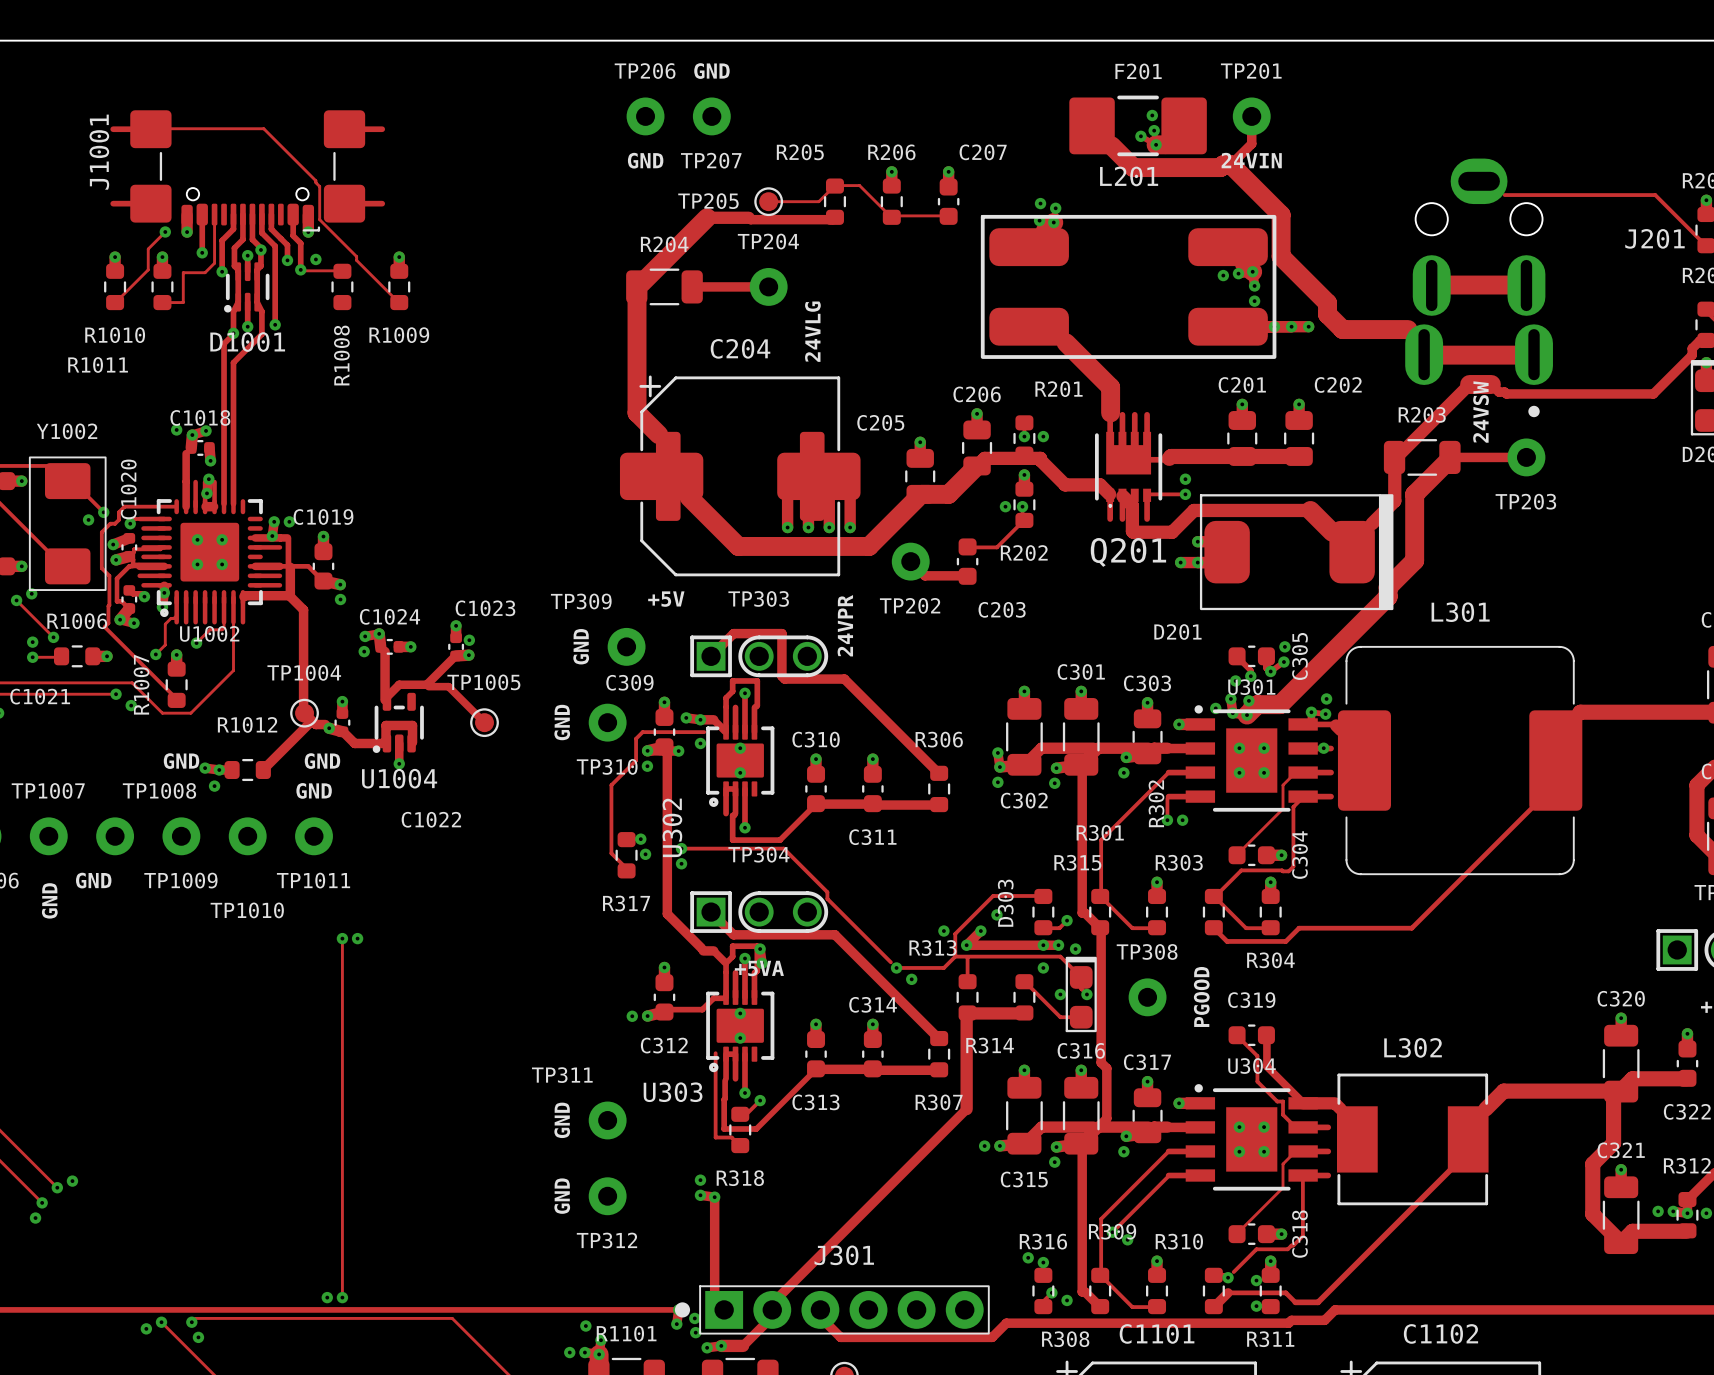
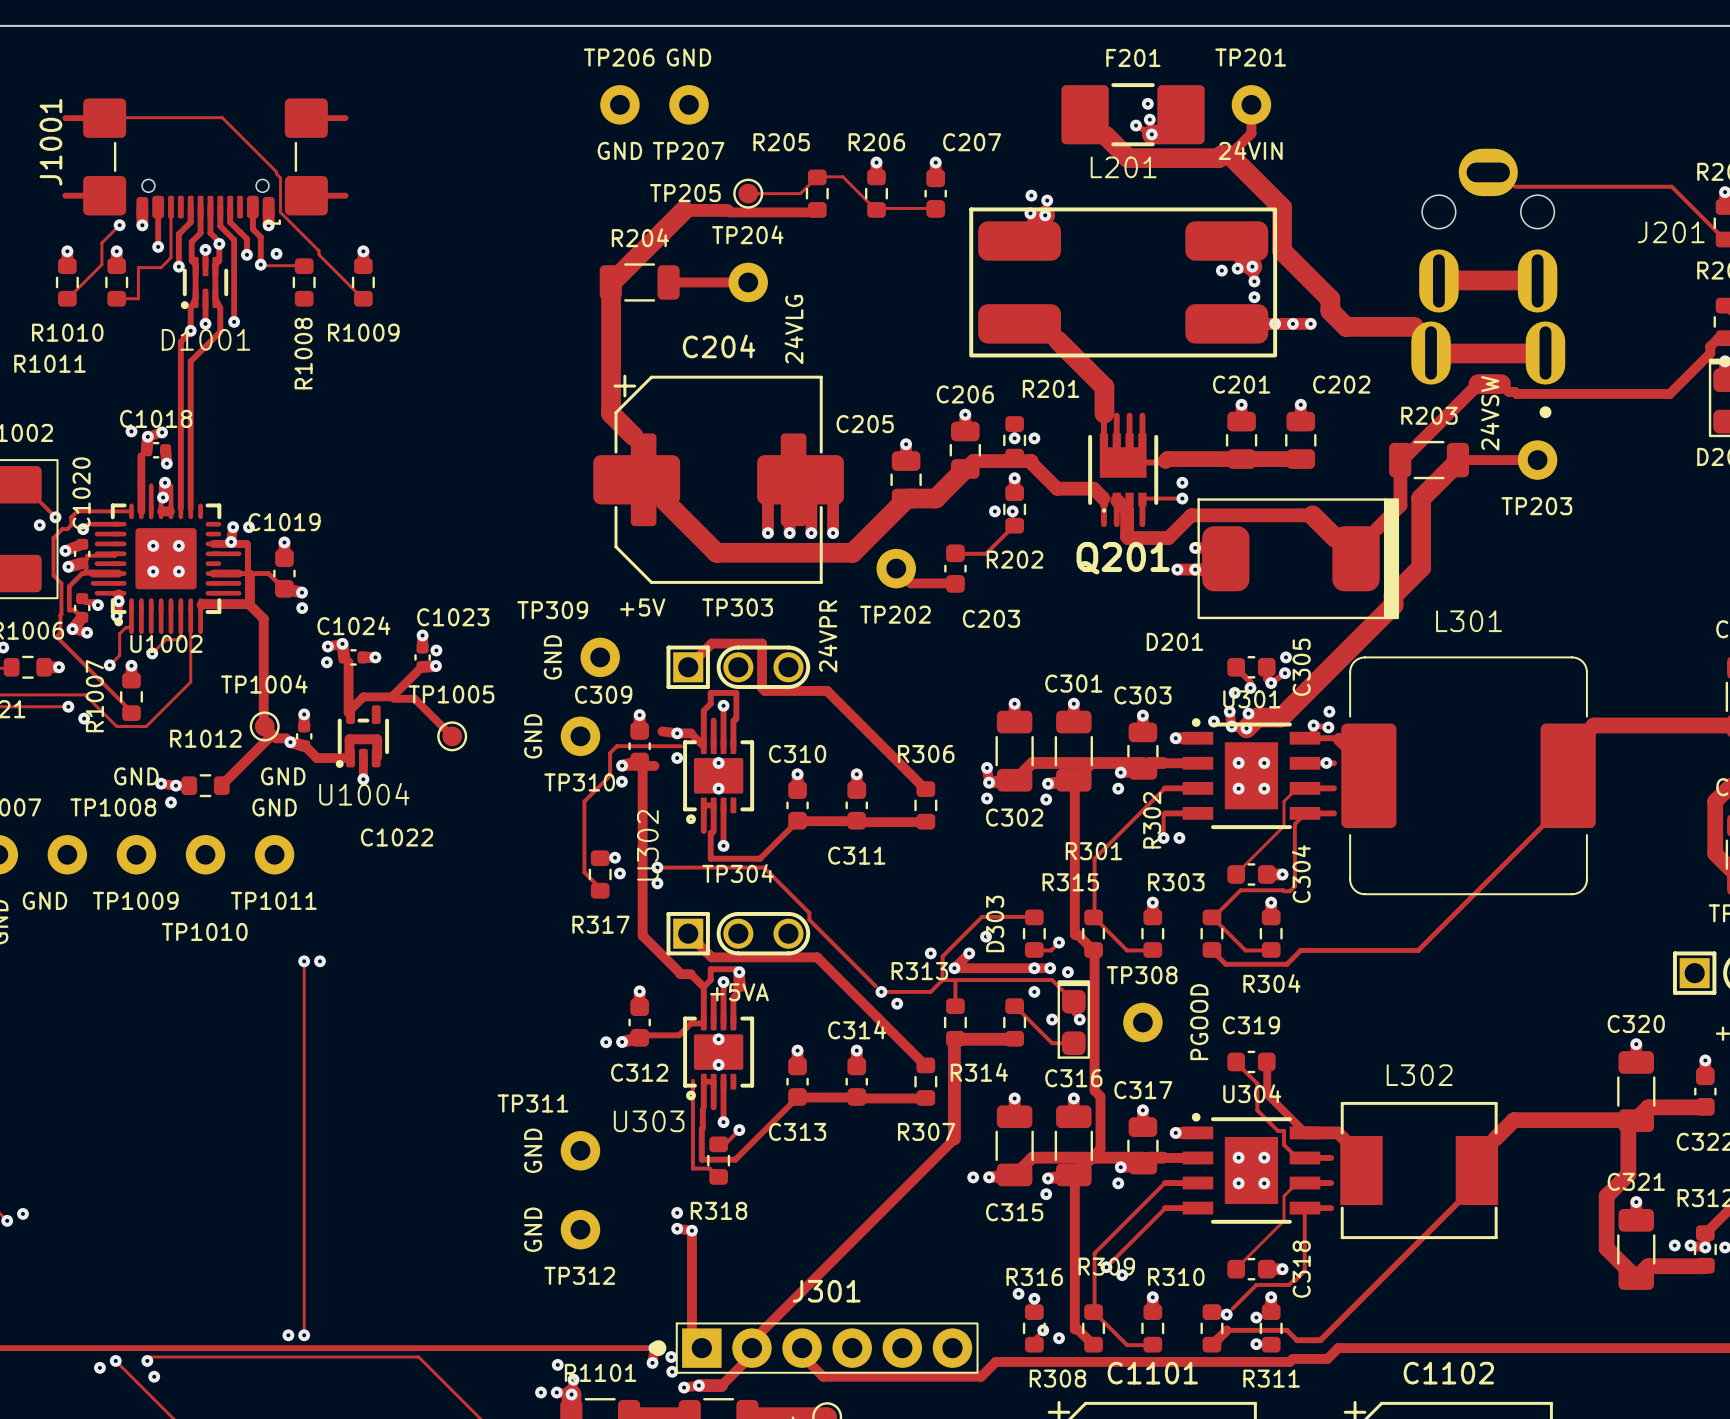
via: (686, 717) -> none
via: (678, 751) -> none
via: (762, 963) -> none

